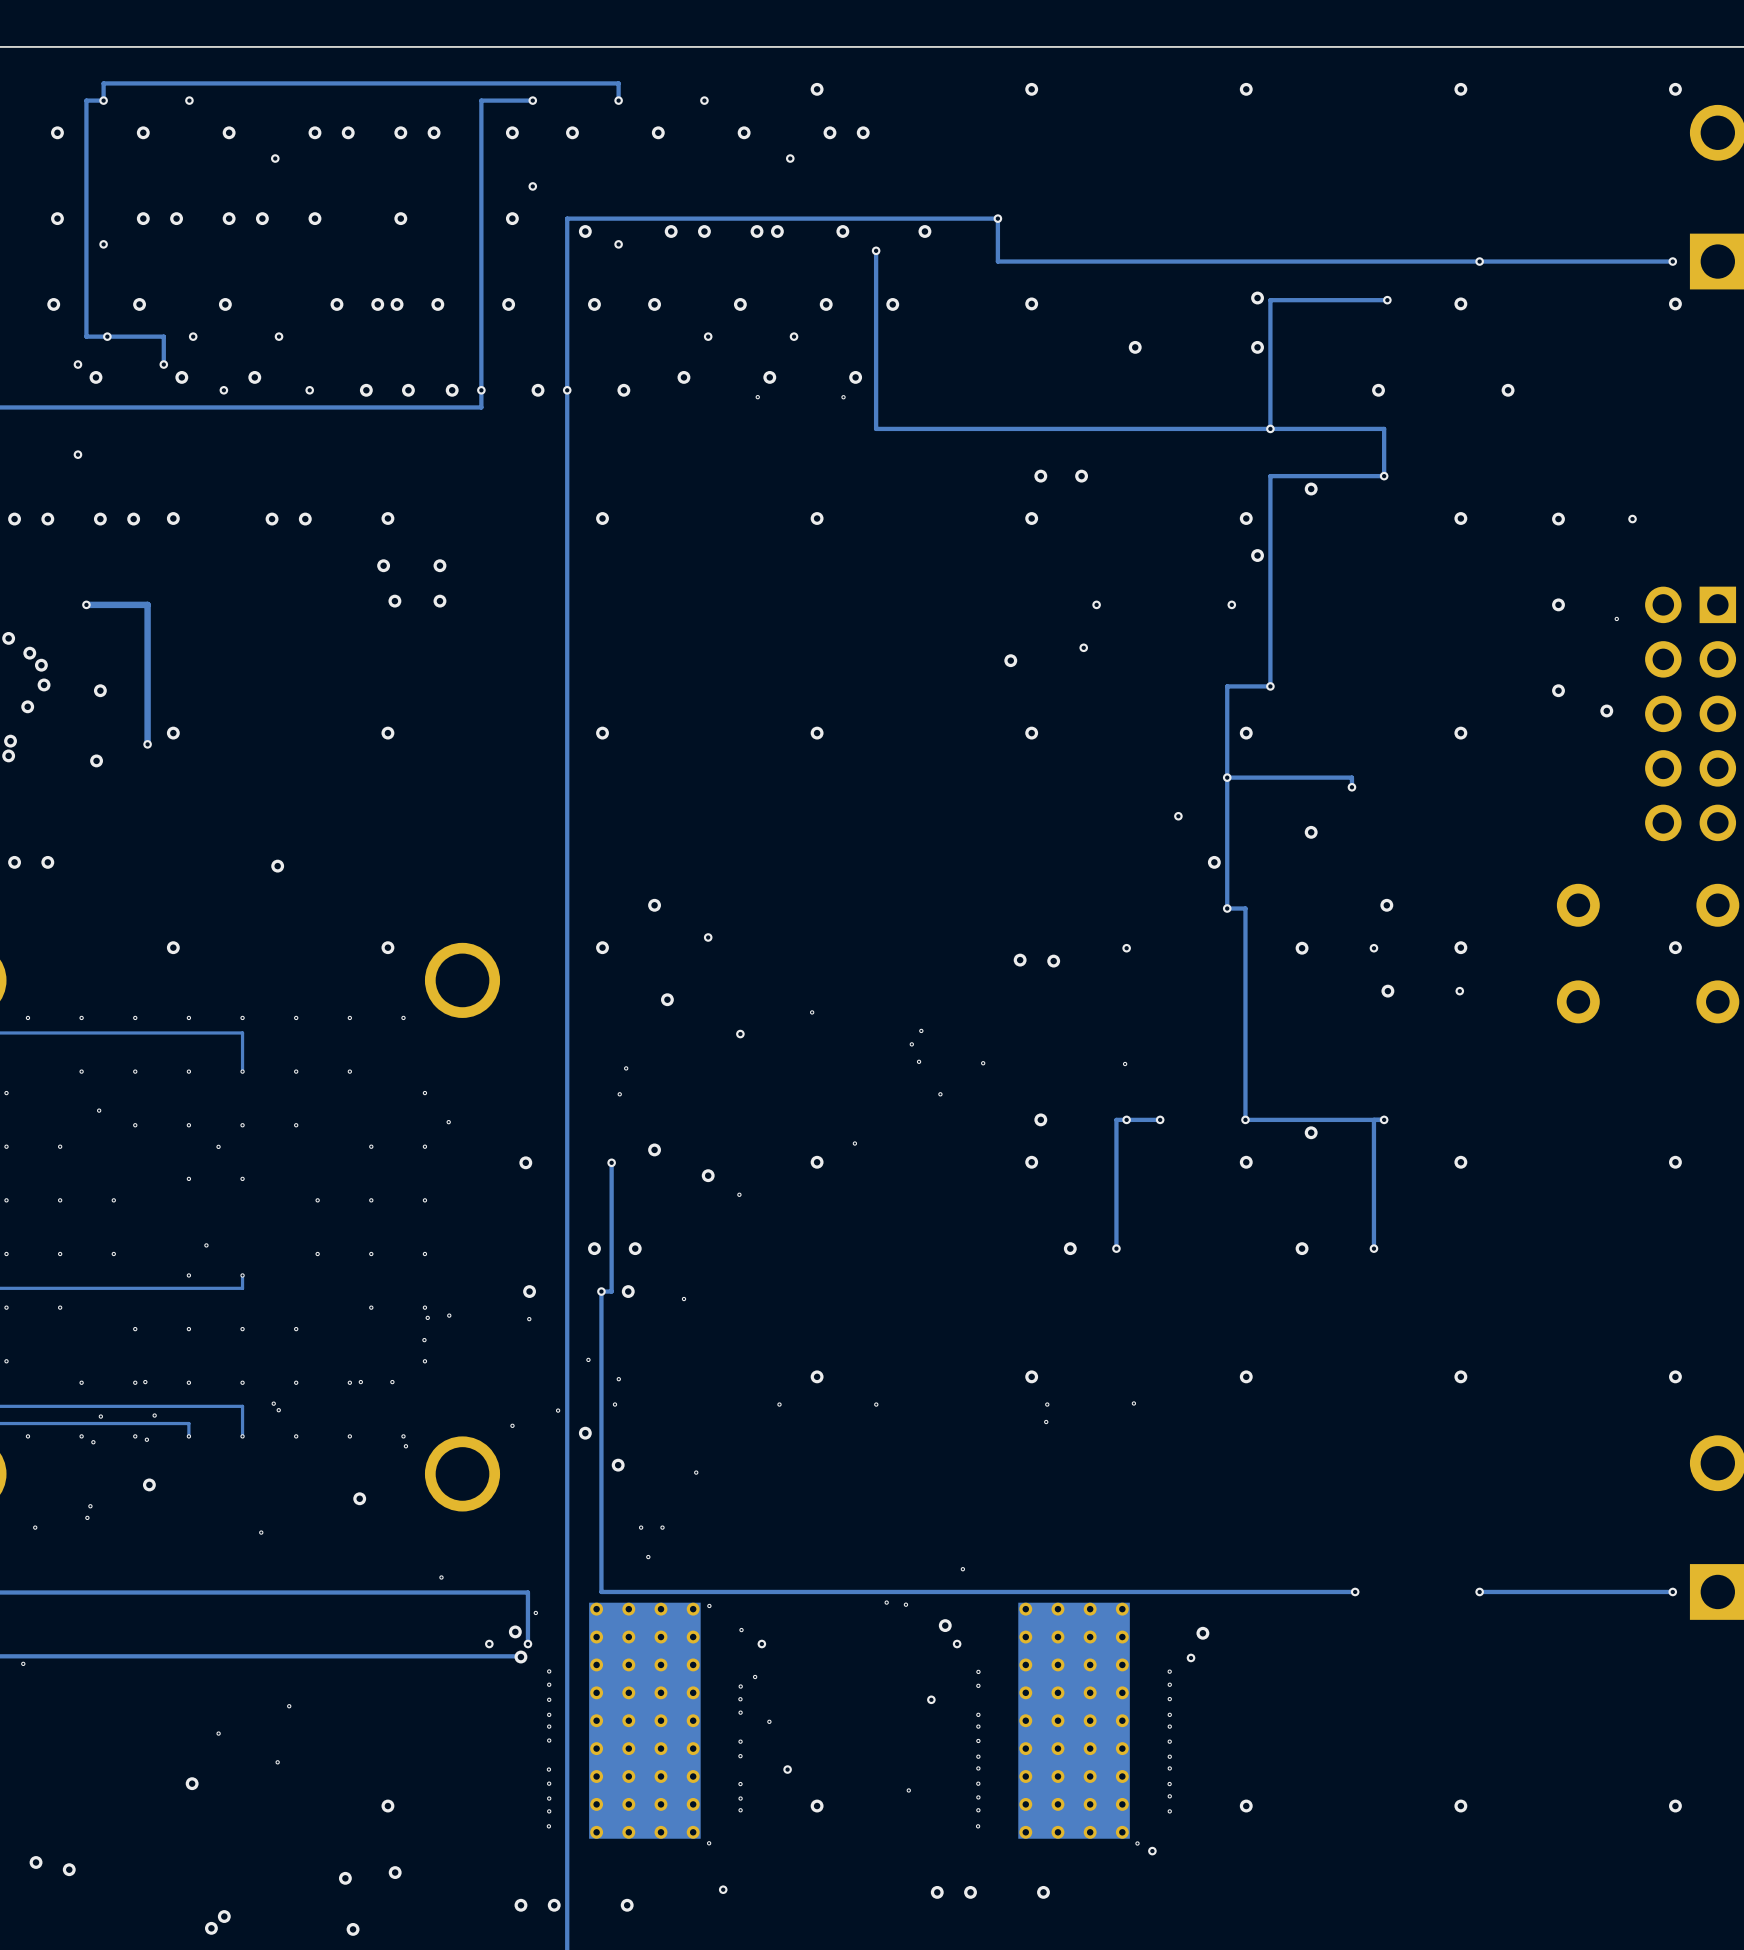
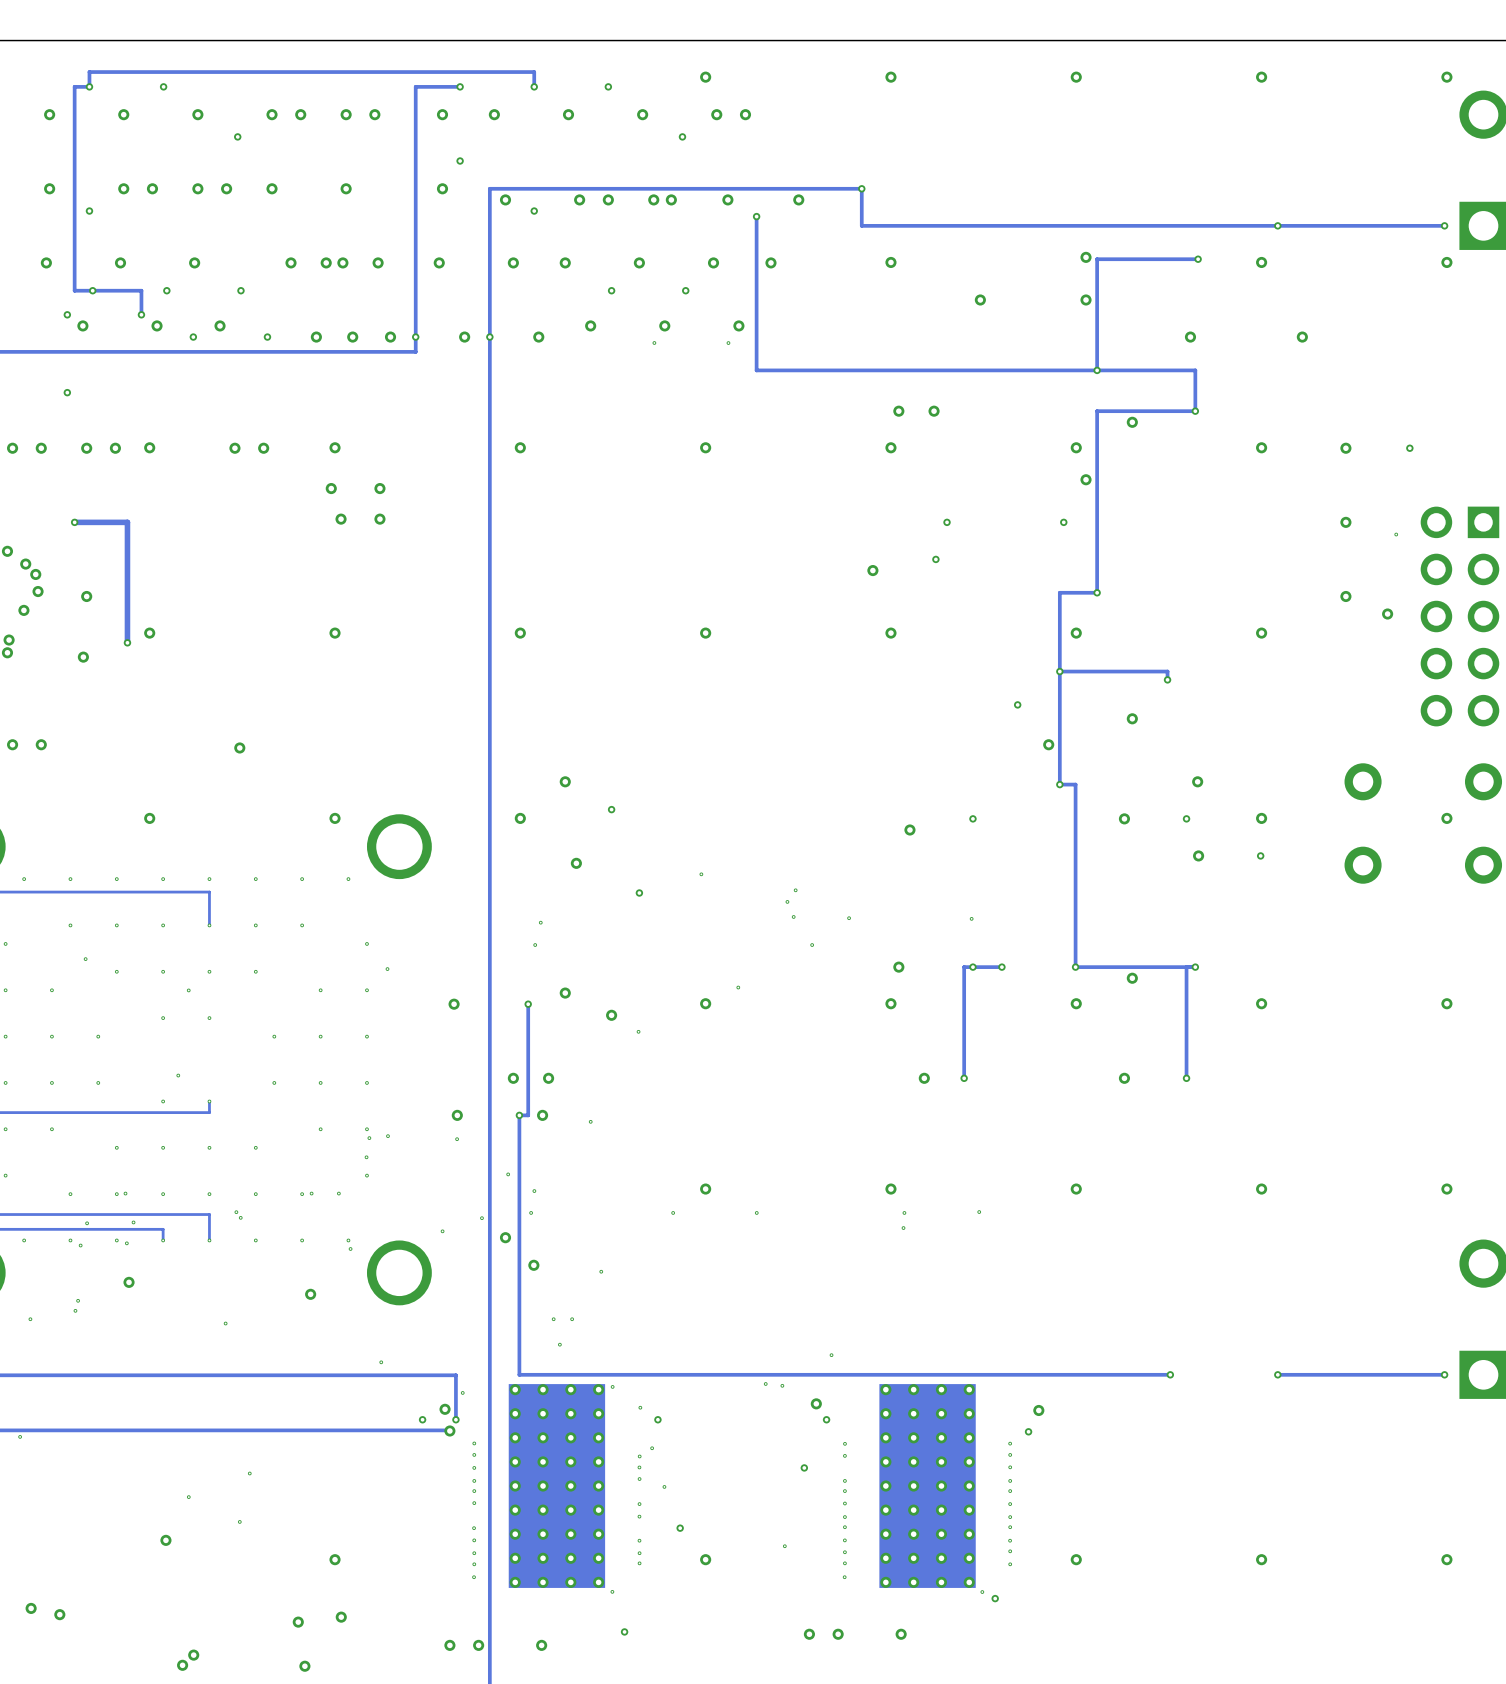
via: (1020, 960) -> none

